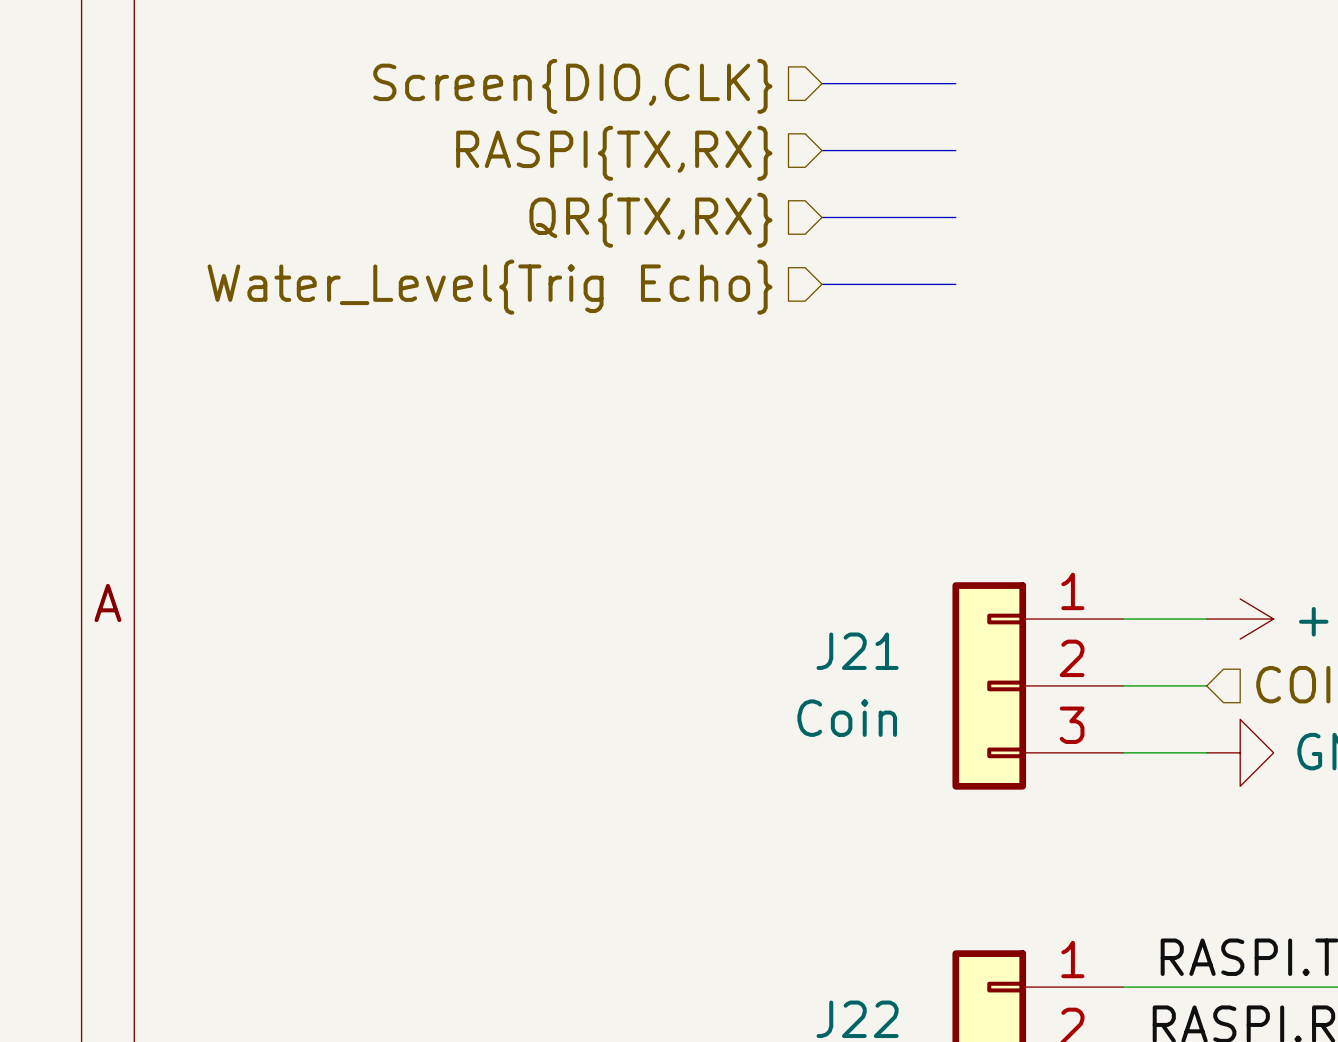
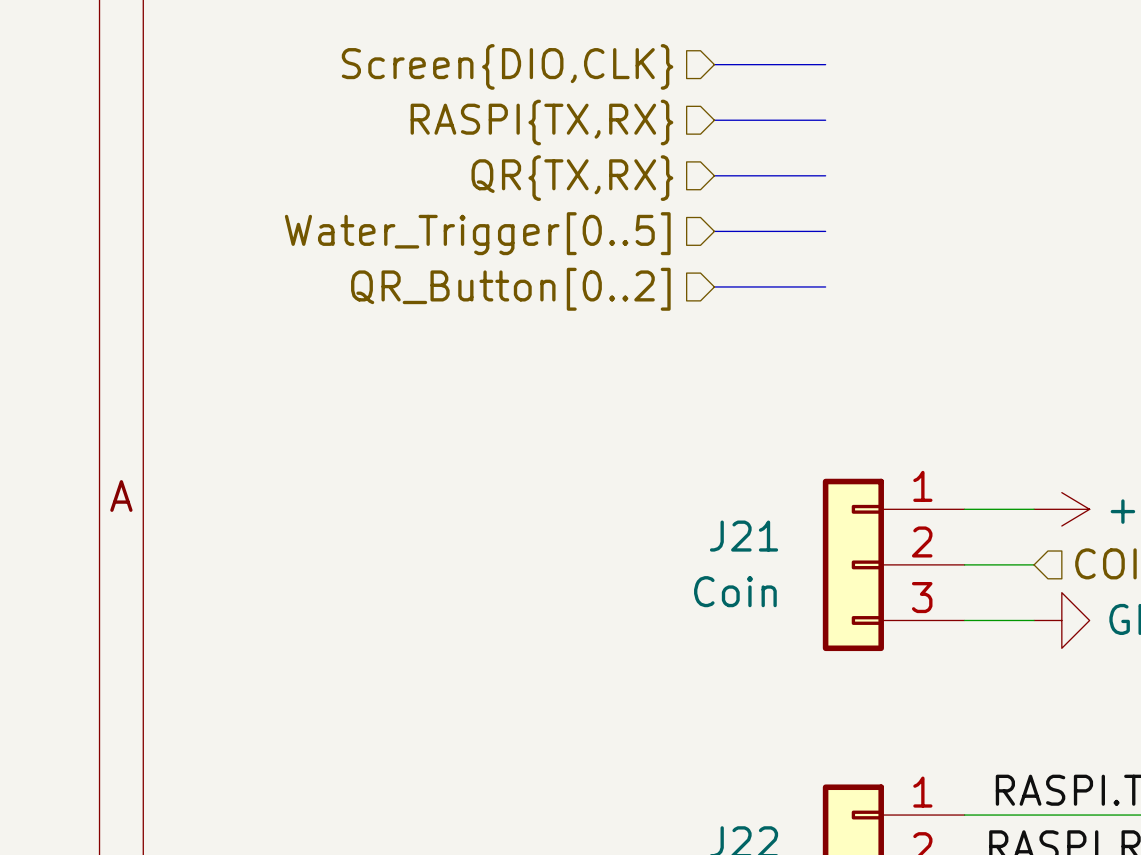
hierarchical label: Water_Level{Trig Echo} (490, 287) -> Water_Trigger[0..5] (477, 233)
bus: none -> (714, 286) (825, 286)
hierarchical label: none -> QR_Button[0..2] (510, 289)

